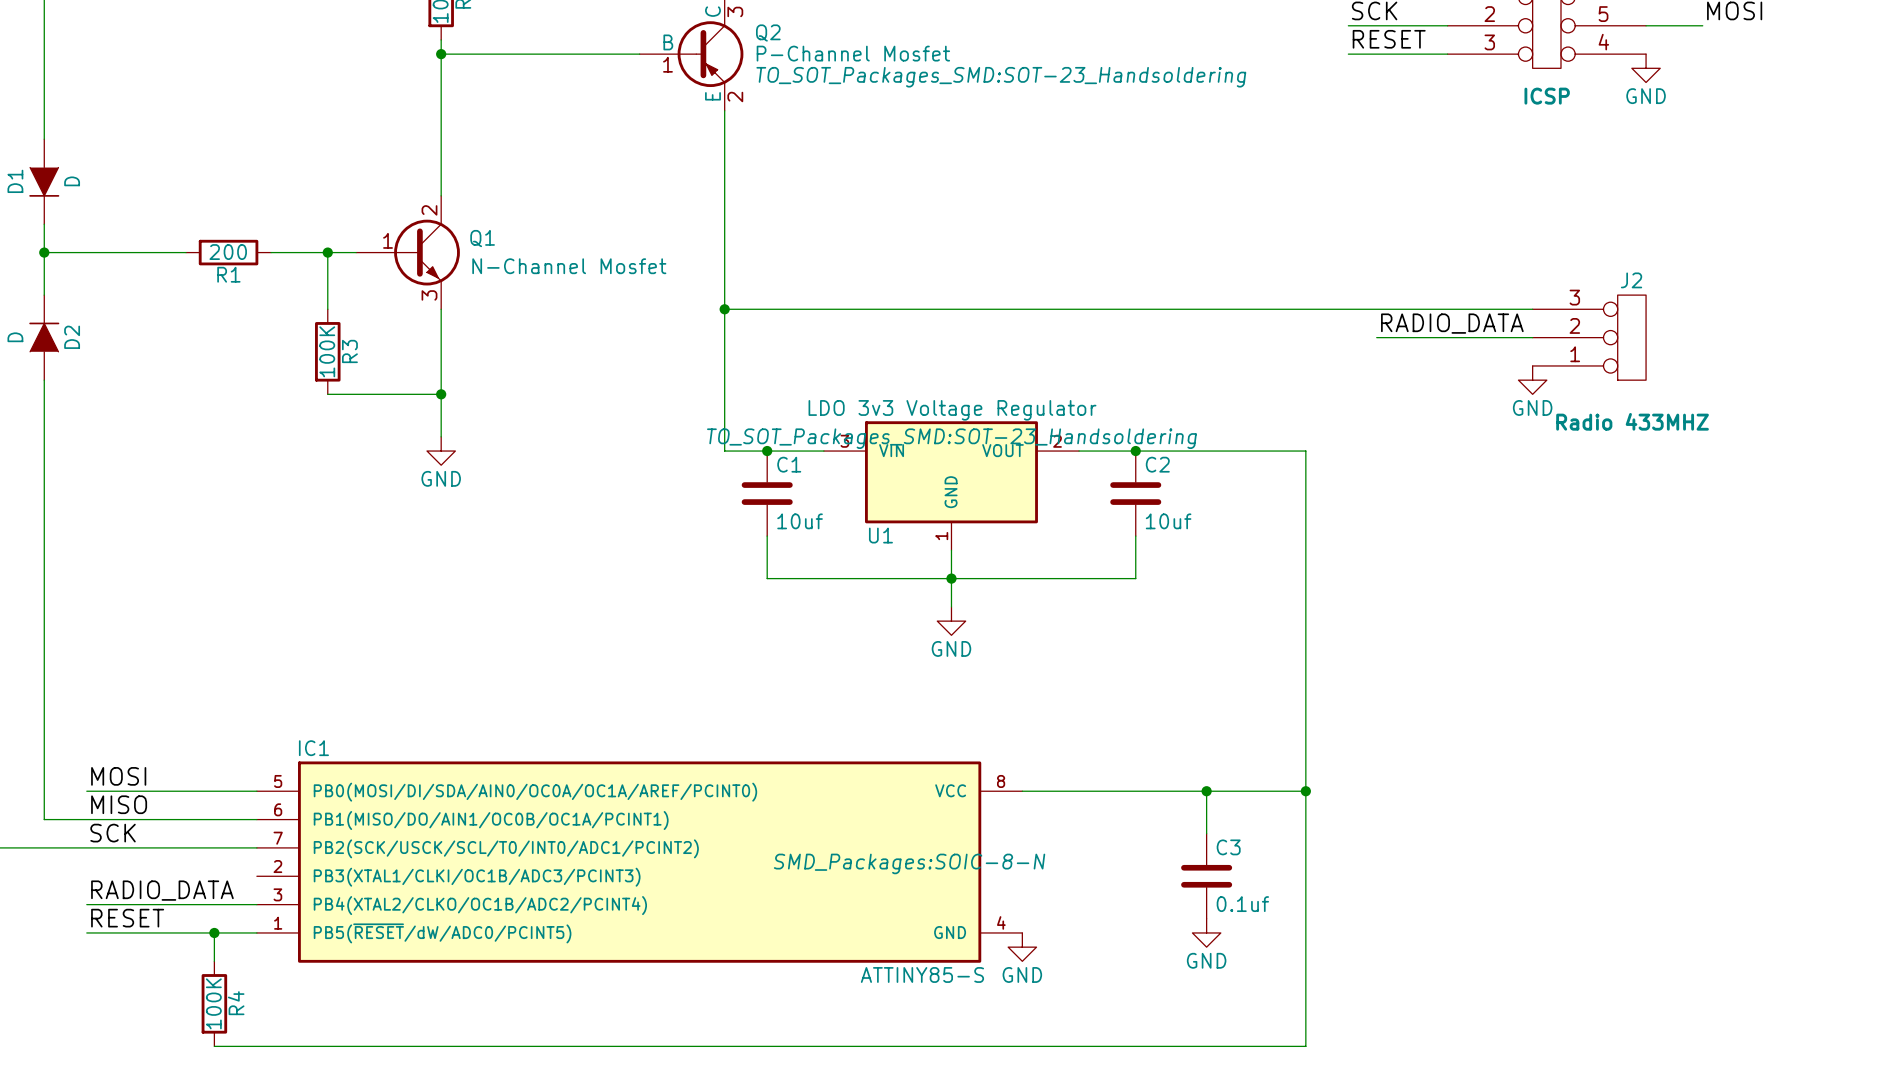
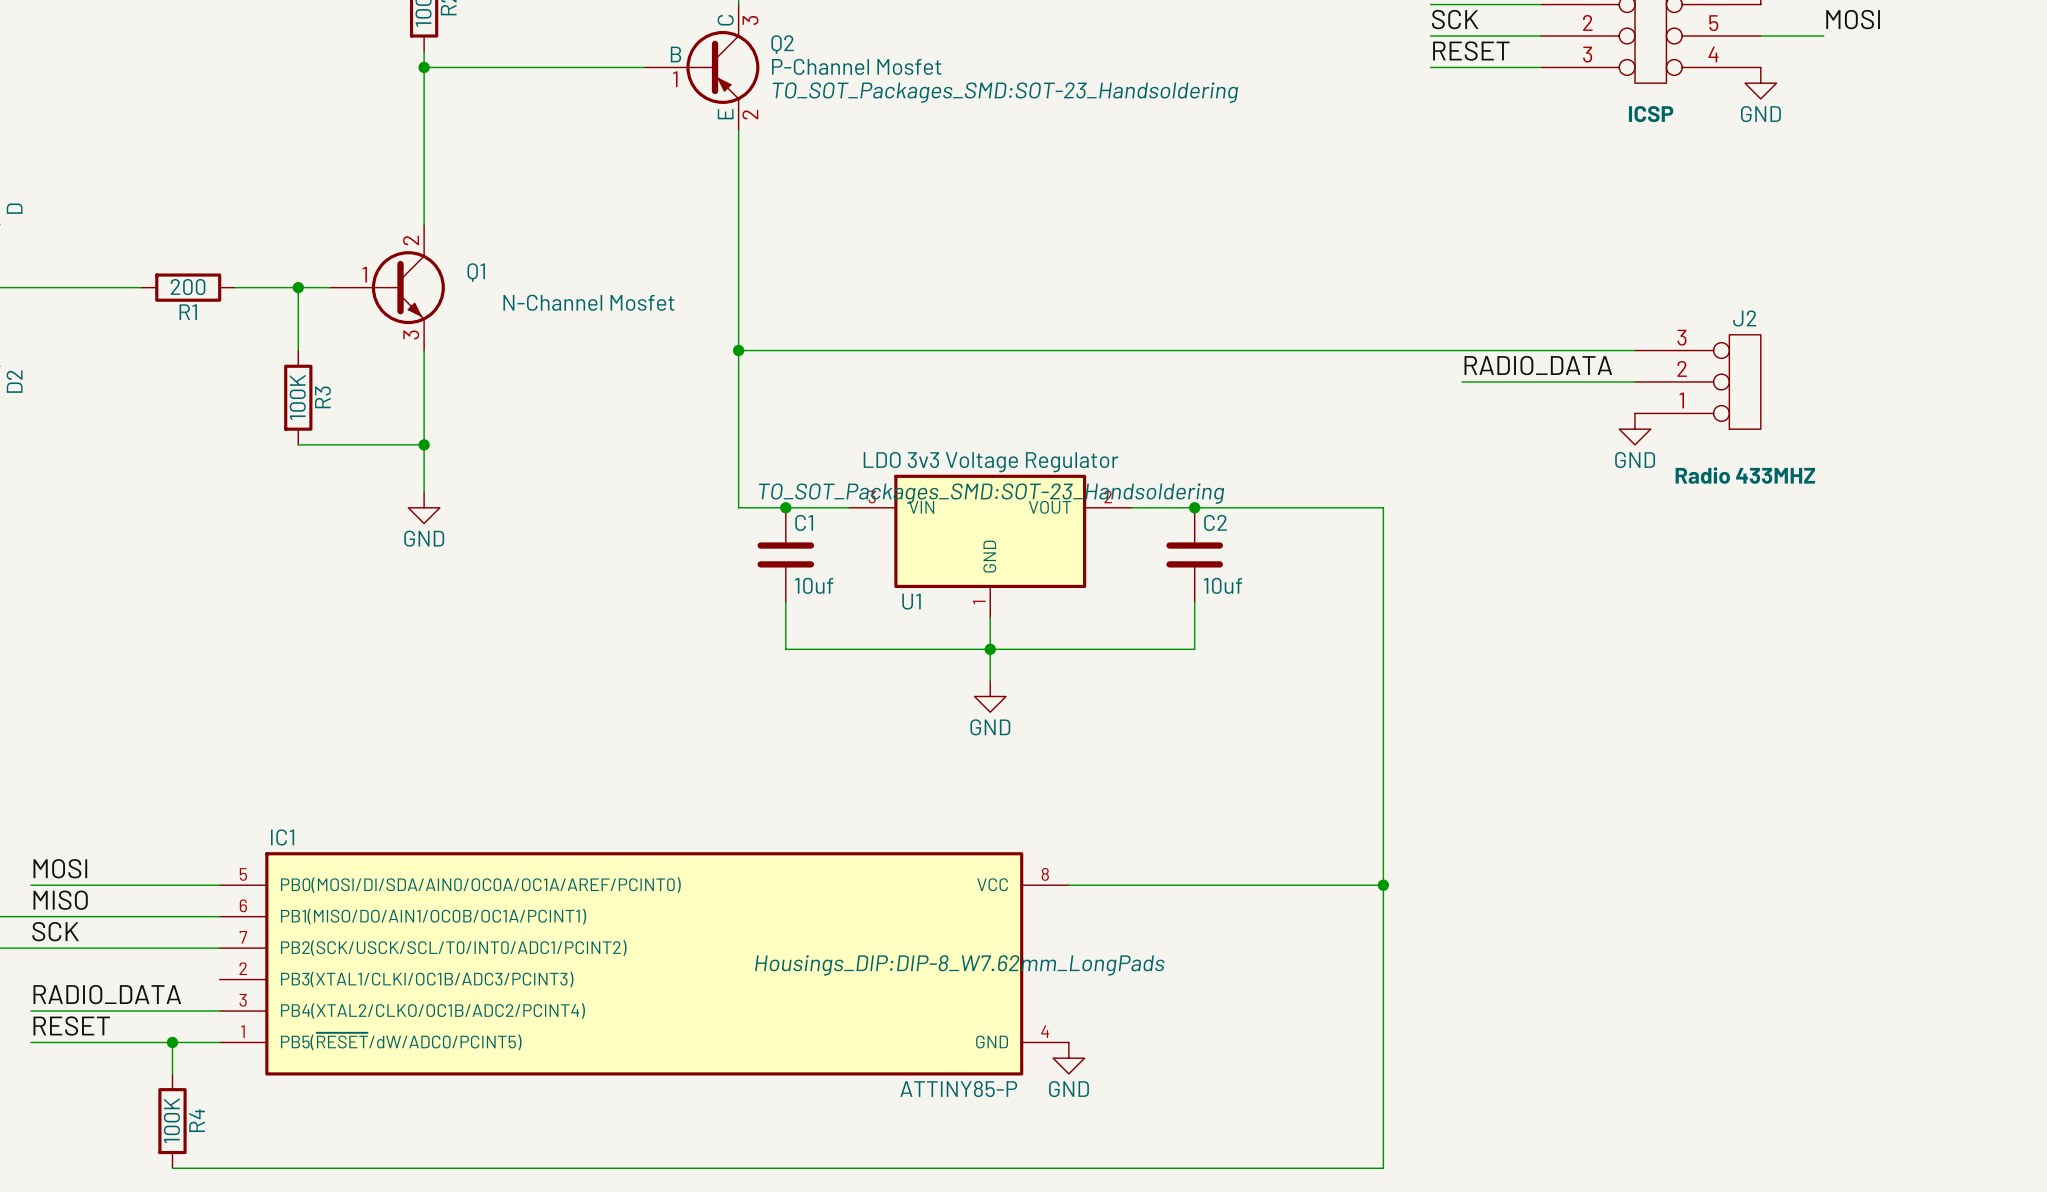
wire: (1206, 791) (1206, 833) -> none
junction: (1206, 791) -> none
IC1 text: SMD_Packages:SOIC-8-N (909, 863) -> Housings_DIP:DIP-8_W7.62mm_LongPads (959, 965)
C3: 0.1uf (1206, 876) -> none
power symbol: GND (1206, 932) -> none
IC1 value: ATTINY85-S (922, 974) -> ATTINY85-P (958, 1089)

